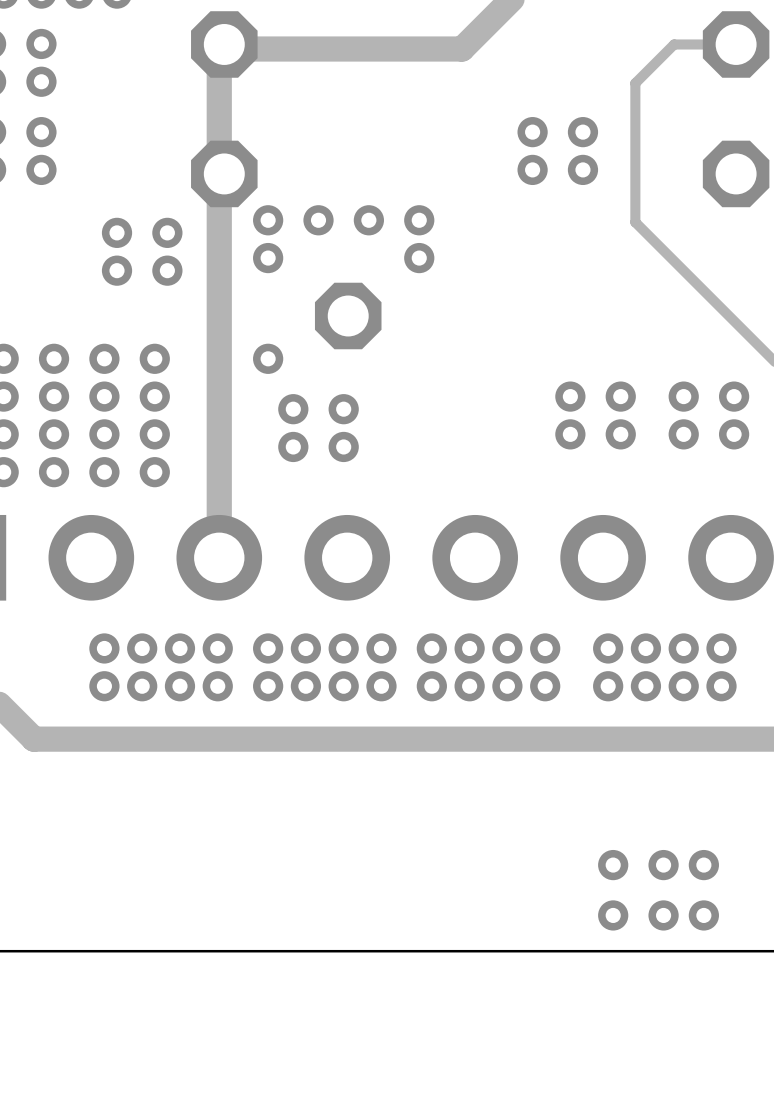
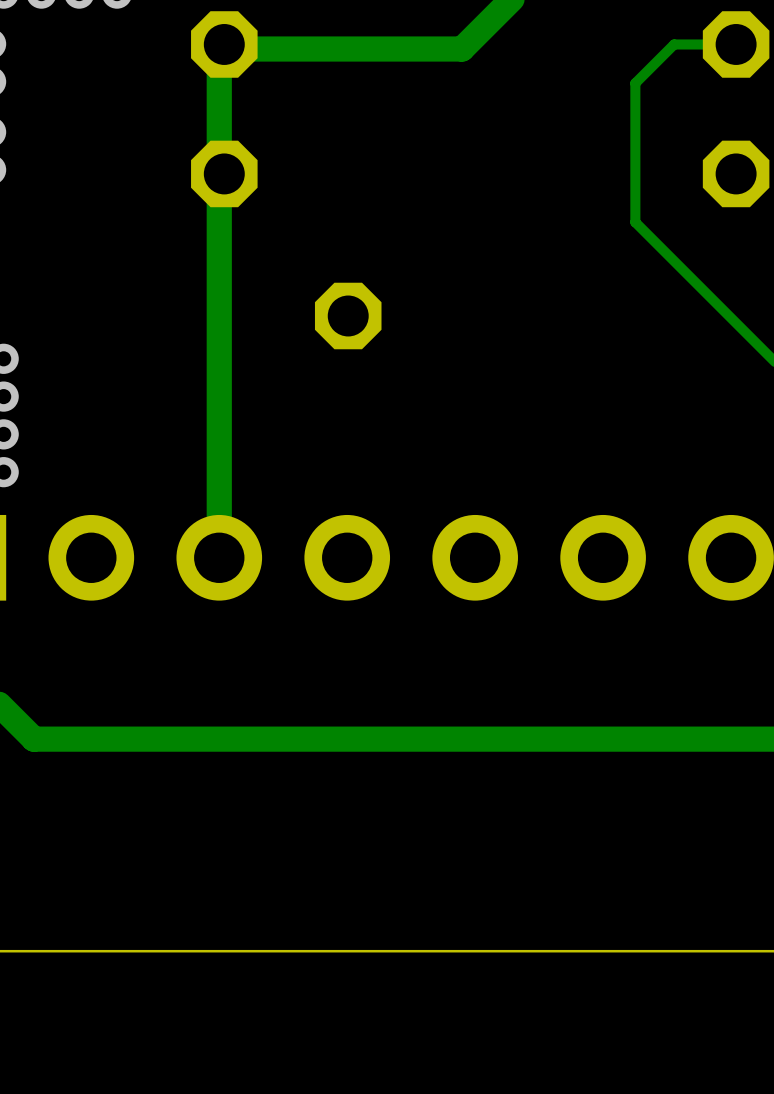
via: (41, 43) -> none
via: (41, 81) -> none
via: (41, 132) -> none
via: (532, 132) -> none
via: (582, 132) -> none
via: (41, 169) -> none
via: (532, 169) -> none
via: (582, 169) -> none
via: (268, 220) -> none
via: (318, 220) -> none
via: (368, 220) -> none
via: (419, 220) -> none
via: (117, 232) -> none
via: (167, 232) -> none
via: (268, 258) -> none
via: (419, 258) -> none
via: (117, 270) -> none
via: (167, 270) -> none
via: (54, 358) -> none
via: (104, 358) -> none
via: (154, 358) -> none
via: (268, 358) -> none
via: (54, 396) -> none
via: (104, 396) -> none
via: (154, 396) -> none
via: (570, 396) -> none
via: (620, 396) -> none
via: (683, 396) -> none
via: (734, 396) -> none
via: (293, 409) -> none
via: (343, 409) -> none
via: (54, 434) -> none
via: (104, 434) -> none
via: (154, 434) -> none
via: (570, 434) -> none
via: (620, 434) -> none
via: (683, 434) -> none
via: (734, 434) -> none
via: (293, 446) -> none
via: (343, 446) -> none
via: (54, 472) -> none
via: (104, 472) -> none
via: (154, 472) -> none
via: (104, 648) -> none
via: (142, 648) -> none
via: (179, 648) -> none
via: (217, 648) -> none
via: (268, 648) -> none
via: (305, 648) -> none
via: (343, 648) -> none
via: (381, 648) -> none
via: (431, 648) -> none
via: (469, 648) -> none
via: (507, 648) -> none
via: (545, 648) -> none
via: (608, 648) -> none
via: (645, 648) -> none
via: (683, 648) -> none
via: (721, 648) -> none
via: (104, 686) -> none
via: (142, 686) -> none
via: (179, 686) -> none
via: (217, 686) -> none
via: (268, 686) -> none
via: (305, 686) -> none
via: (343, 686) -> none
via: (381, 686) -> none
via: (431, 686) -> none
via: (469, 686) -> none
via: (507, 686) -> none
via: (545, 686) -> none
via: (608, 686) -> none
via: (645, 686) -> none
via: (683, 686) -> none
via: (721, 686) -> none
via: (613, 865) -> none
via: (663, 865) -> none
via: (703, 865) -> none
via: (613, 915) -> none
via: (663, 915) -> none
via: (703, 915) -> none

